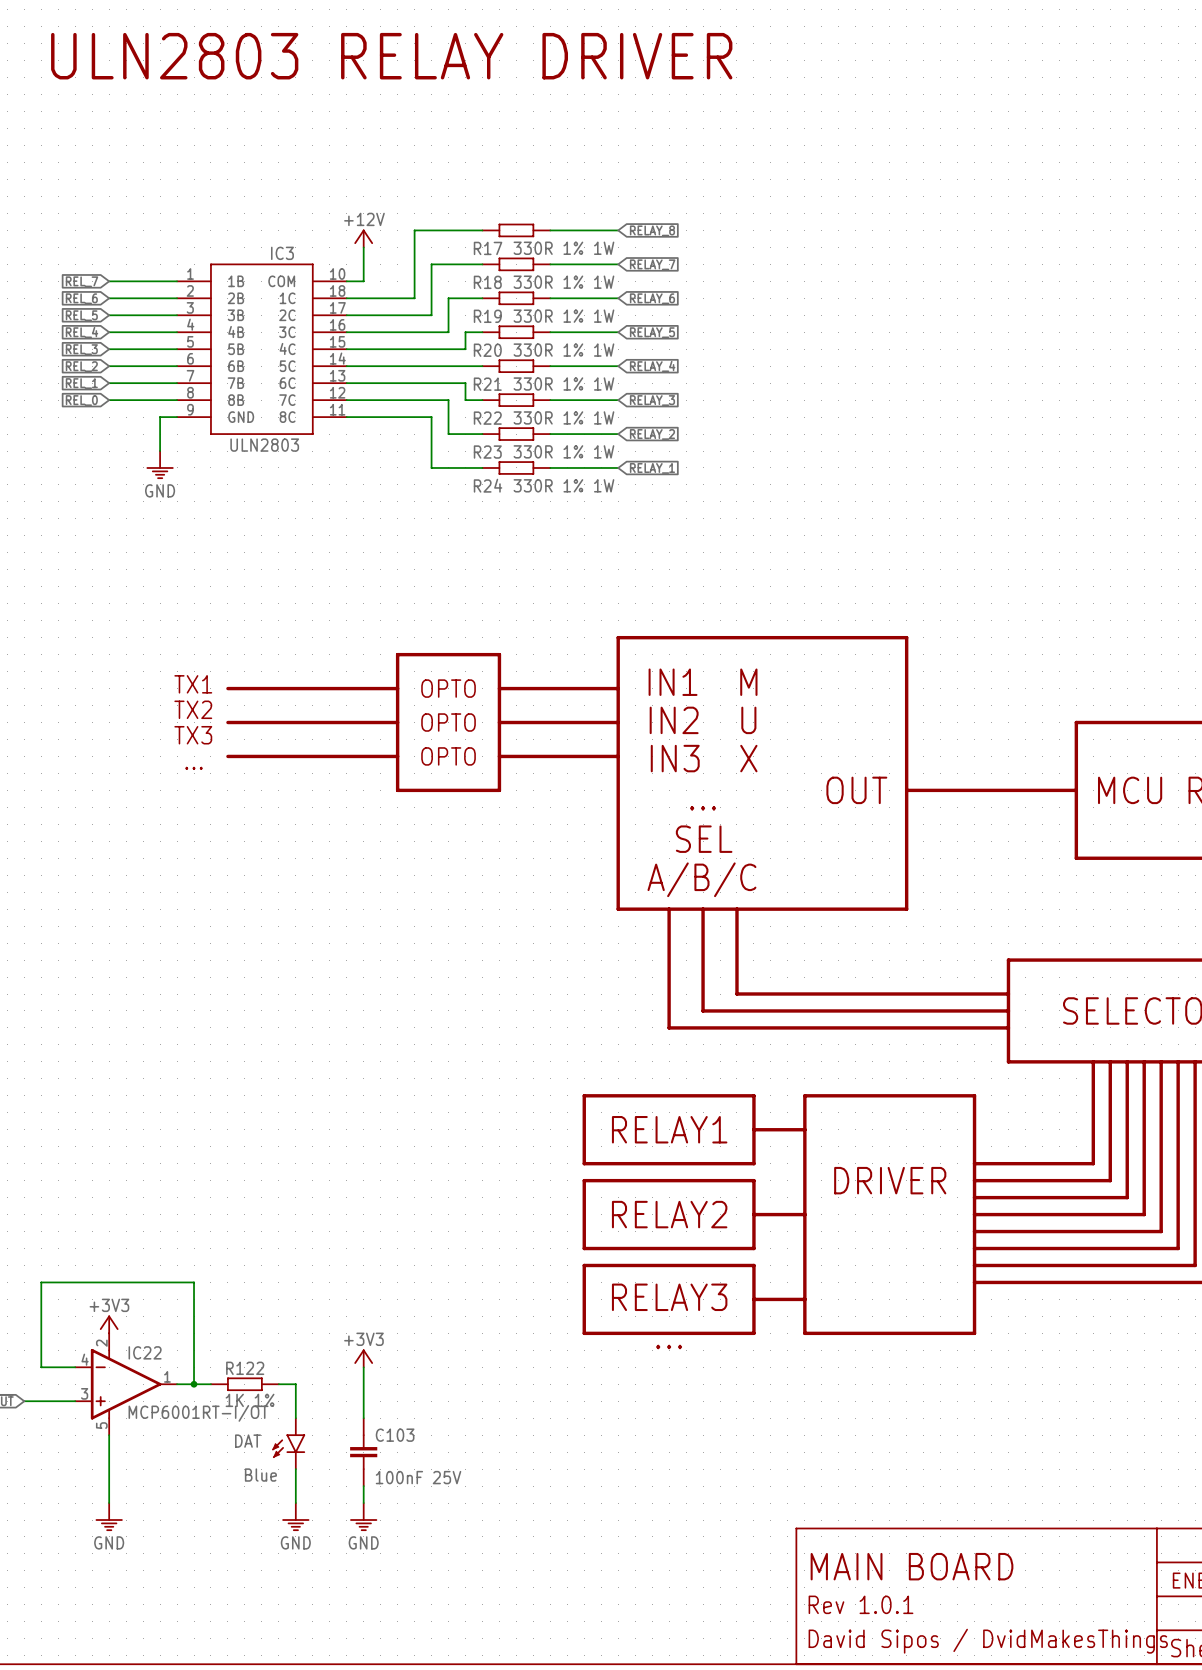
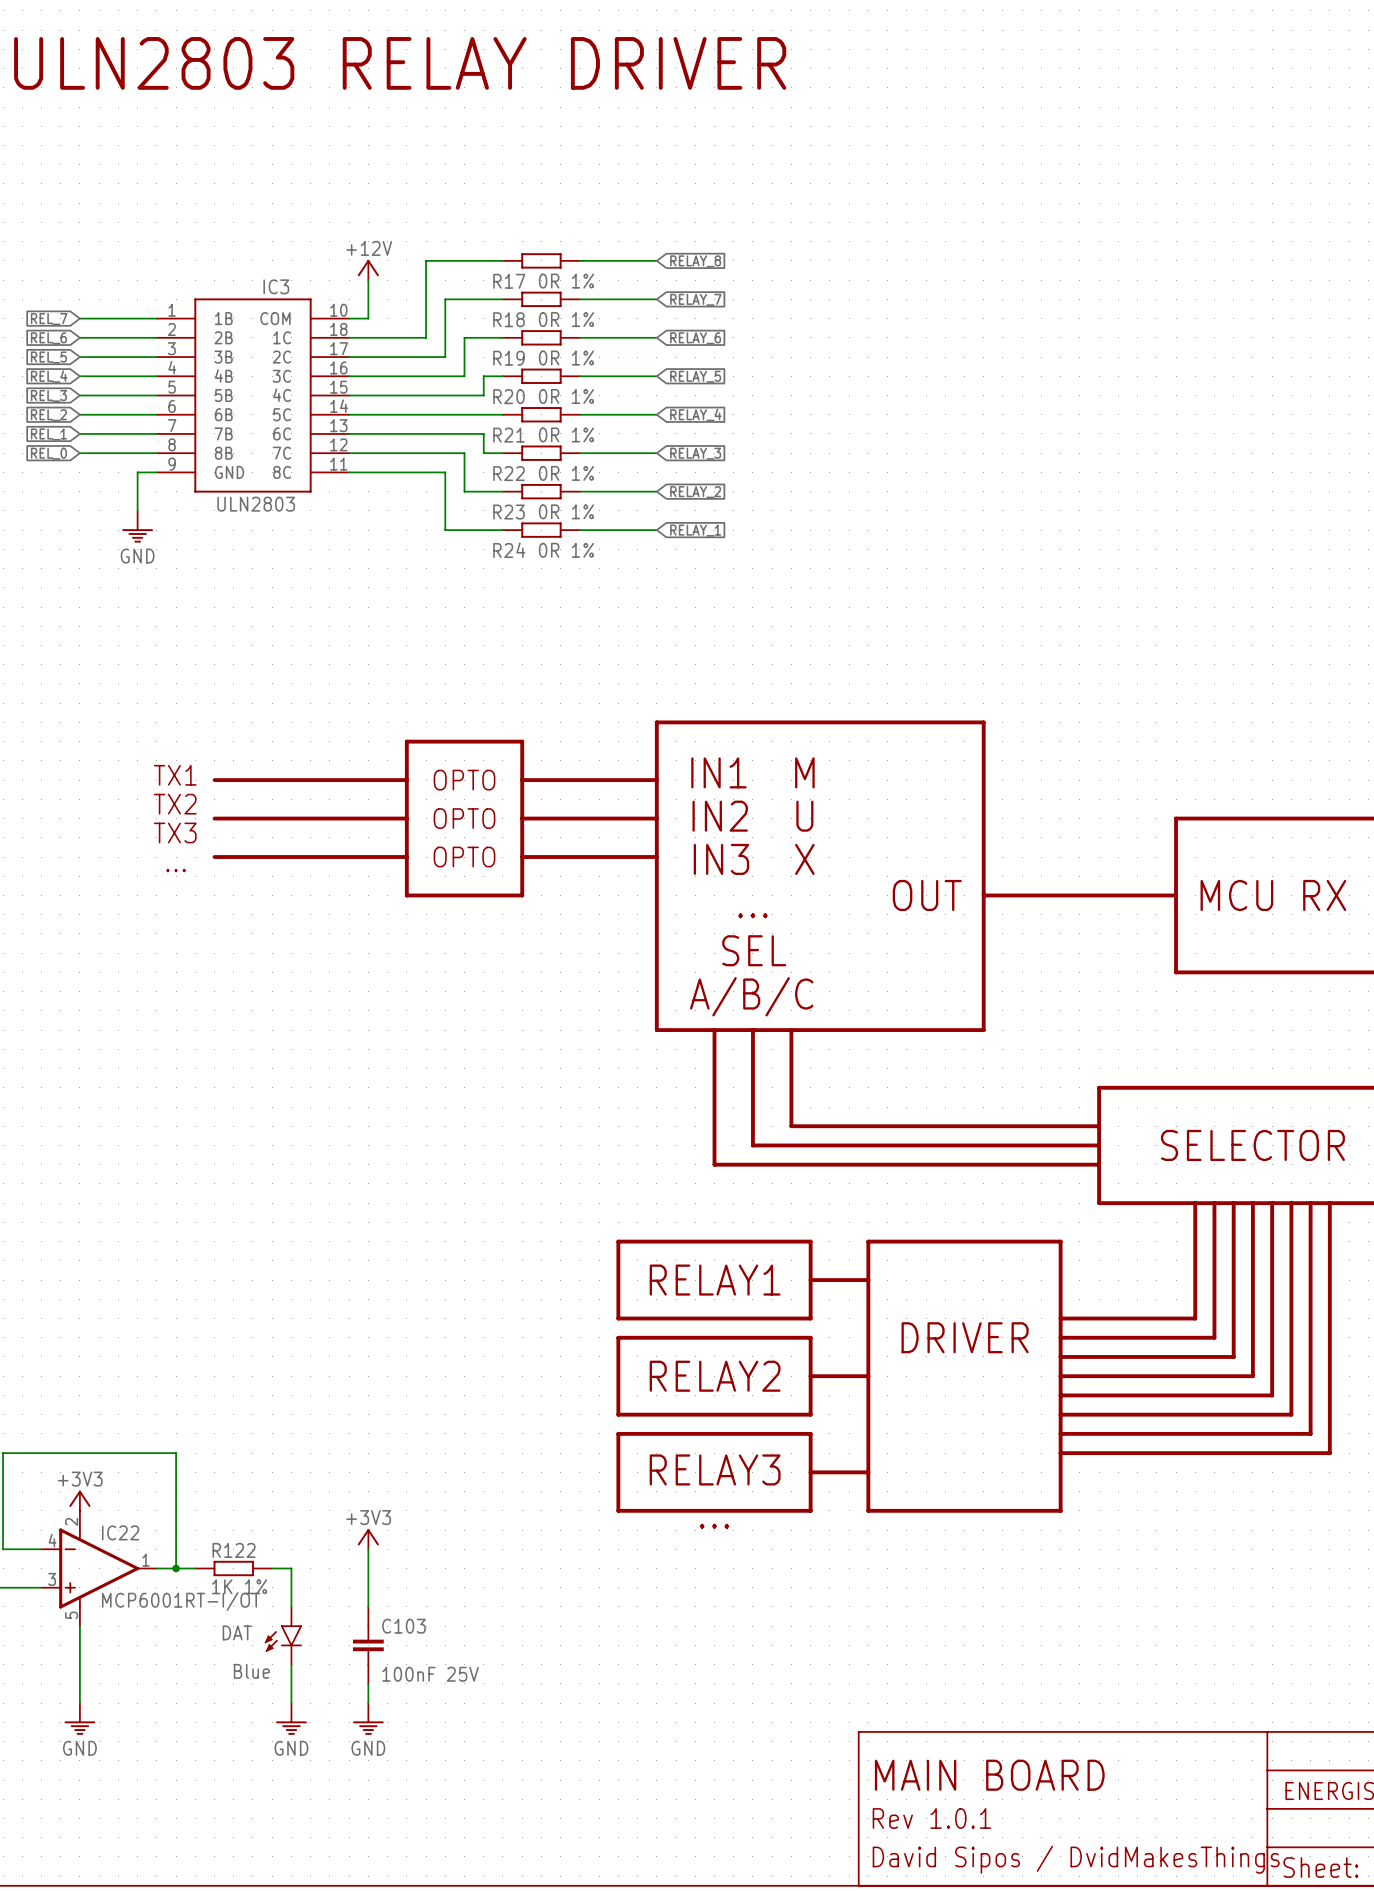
R17 value: 330R 1% 1W (563, 248) -> 0R 1% (566, 281)
R18 value: 330R 1% 1W (563, 282) -> 0R 1% (566, 319)
R19 value: 330R 1% 1W (563, 316) -> 0R 1% (566, 358)
R20 value: 330R 1% 1W (563, 350) -> 0R 1% (566, 396)
R21 value: 330R 1% 1W (563, 384) -> 0R 1% (566, 434)
R22 value: 330R 1% 1W (563, 417) -> 0R 1% (566, 473)
R23 value: 330R 1% 1W (563, 451) -> 0R 1% (566, 511)
R24 value: 330R 1% 1W (563, 485) -> 0R 1% (566, 550)

